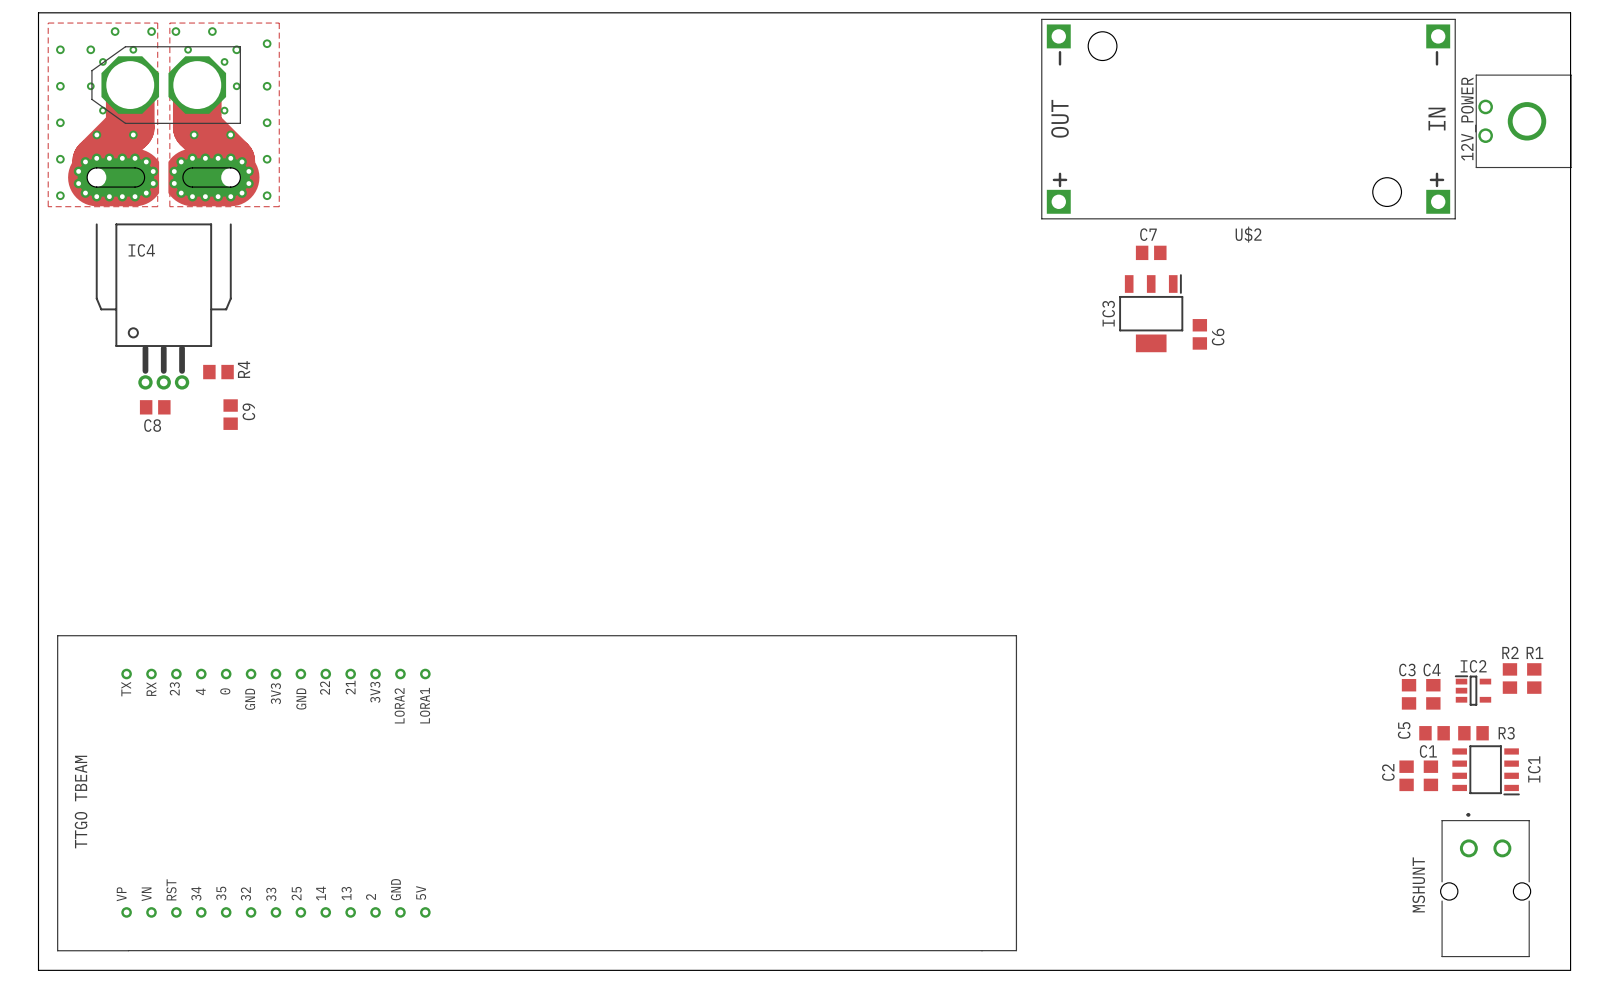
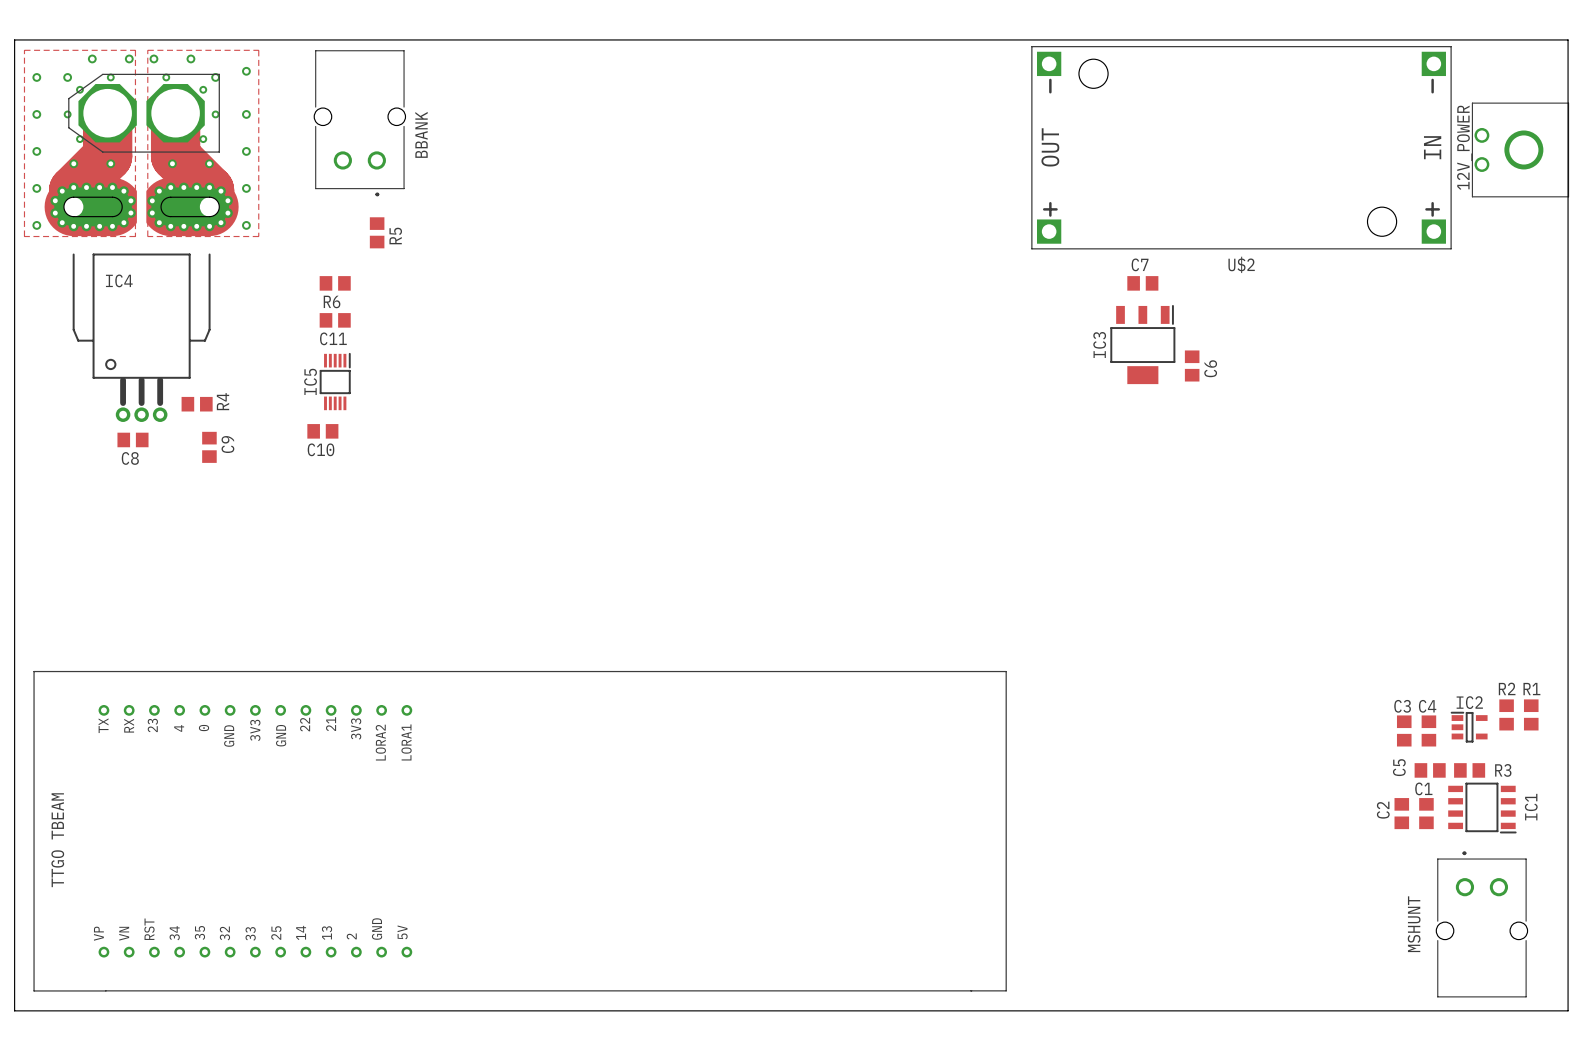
BBANK: none -> (359, 123)
R5: none -> (377, 232)
R6: none -> (335, 283)
C11: none -> (335, 320)
IC5: none -> (335, 381)
C10: none -> (322, 431)

